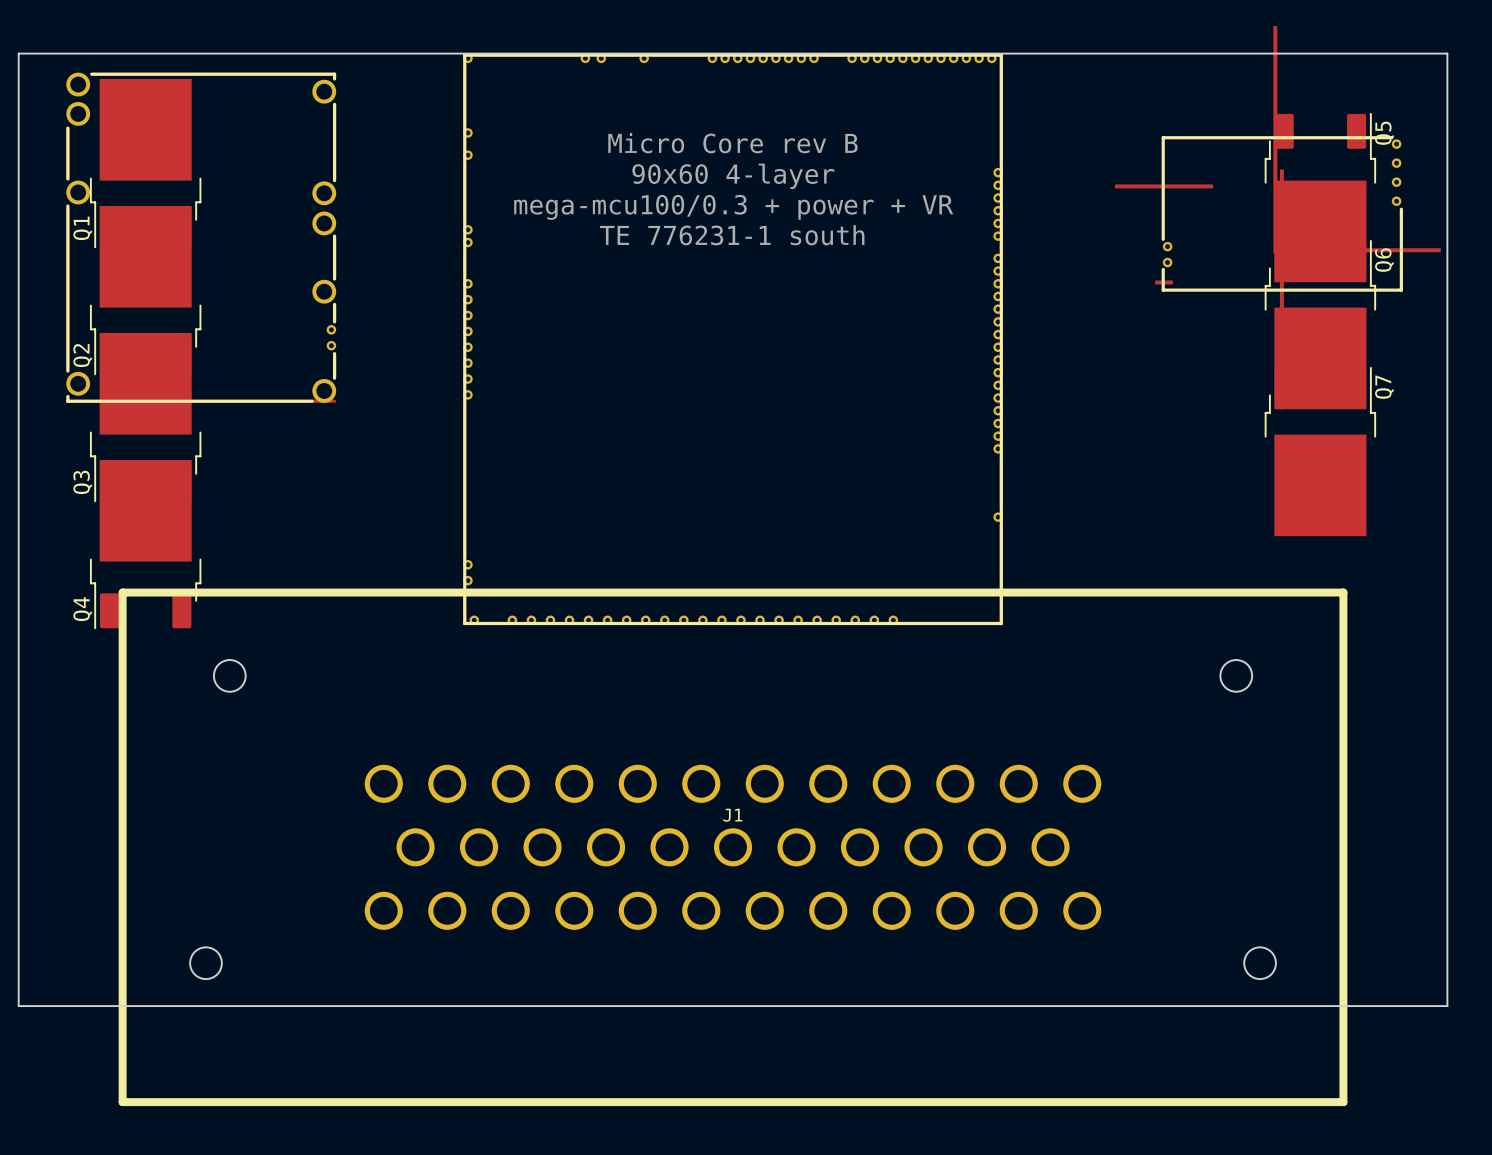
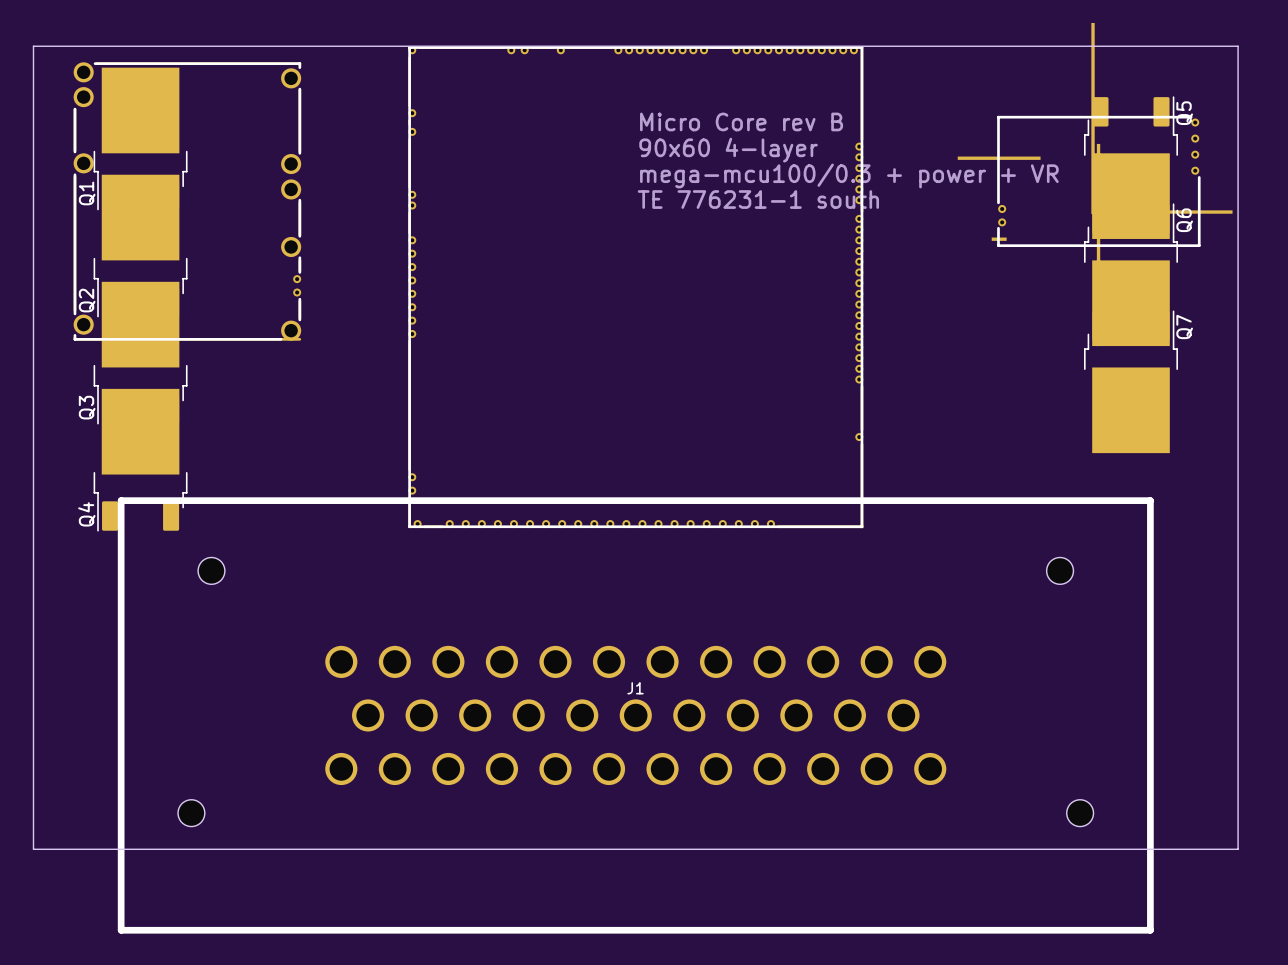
text position: Micro Core rev B (732, 143) -> Micro Core rev B (741, 121)
text position: 90x60 4-layer (733, 176) -> 90x60 4-layer (728, 150)
text position: mega-mcu100/0.3 + power + VR (733, 207) -> mega-mcu100/0.3 + power + VR (849, 175)
text position: TE 776231-1 south (732, 235) -> TE 776231-1 south (758, 199)

